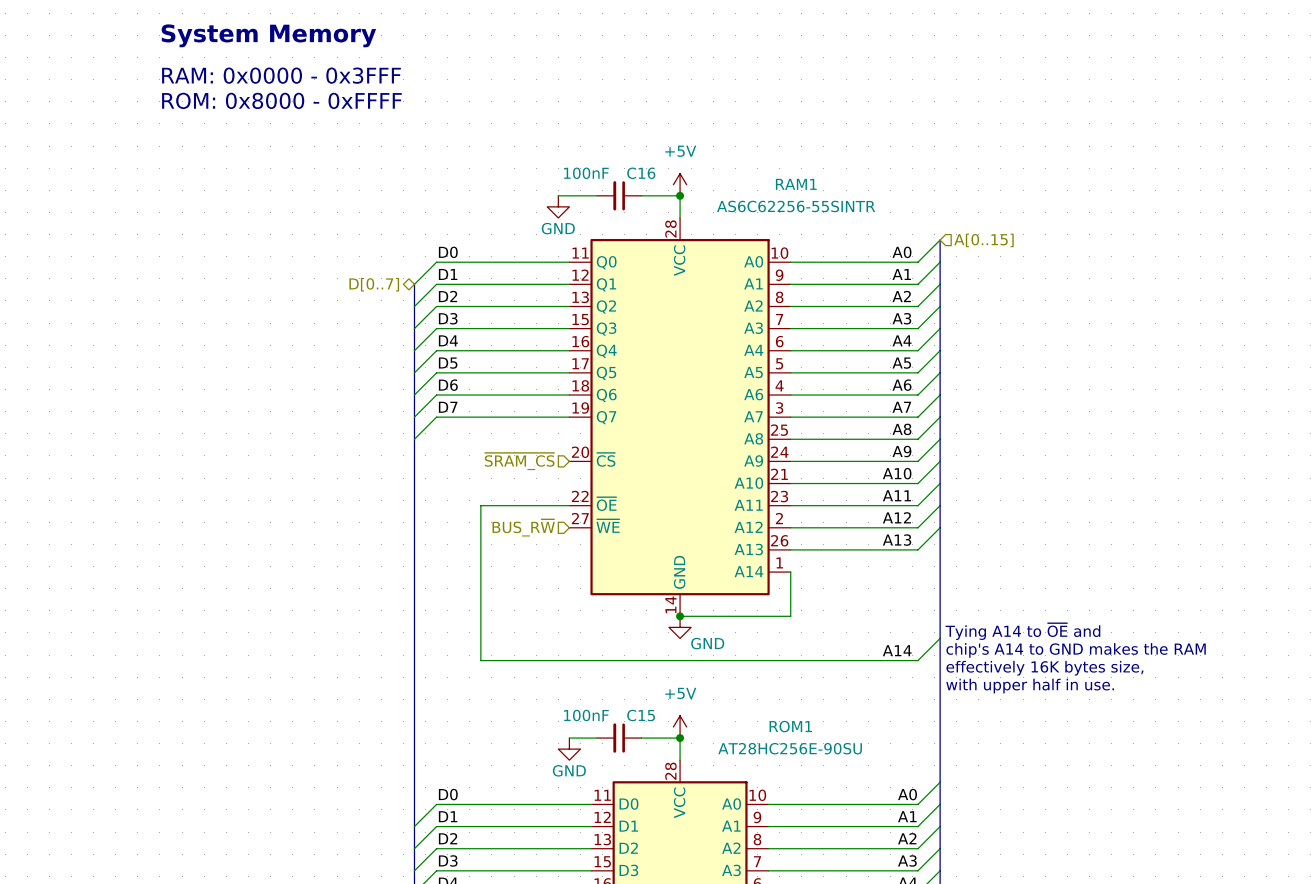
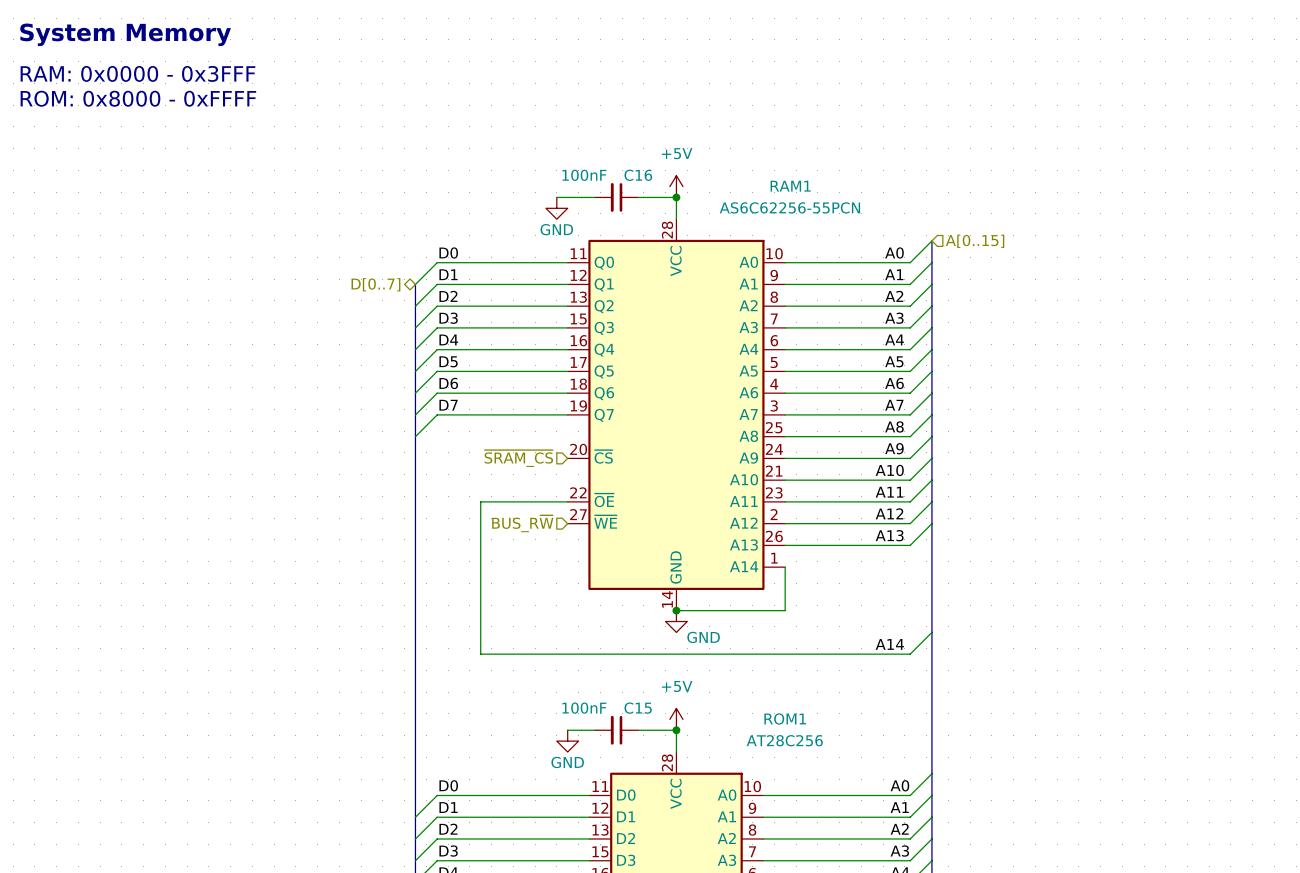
text position: System Memory (268, 35) -> System Memory (125, 34)
text position: RAM: 0x0000 - 0x3FFF (281, 75) -> RAM: 0x0000 - 0x3FFF (137, 73)
text position: ROM: 0x8000 - 0xFFFF (281, 100) -> ROM: 0x8000 - 0xFFFF (138, 98)
RAM1 value: AS6C62256-55SINTR (796, 206) -> AS6C62256-55PCN (789, 207)
text: Tying A14 to ~{OE} and (1022, 631) -> none
text: chip's A14 to GND makes the RAM (1076, 650) -> none
text: effectively 16K bytes size, (1044, 668) -> none
text: with upper half in use. (1030, 686) -> none
ROM1 value: AT28HC256E-90SU (790, 748) -> AT28C256 (784, 740)

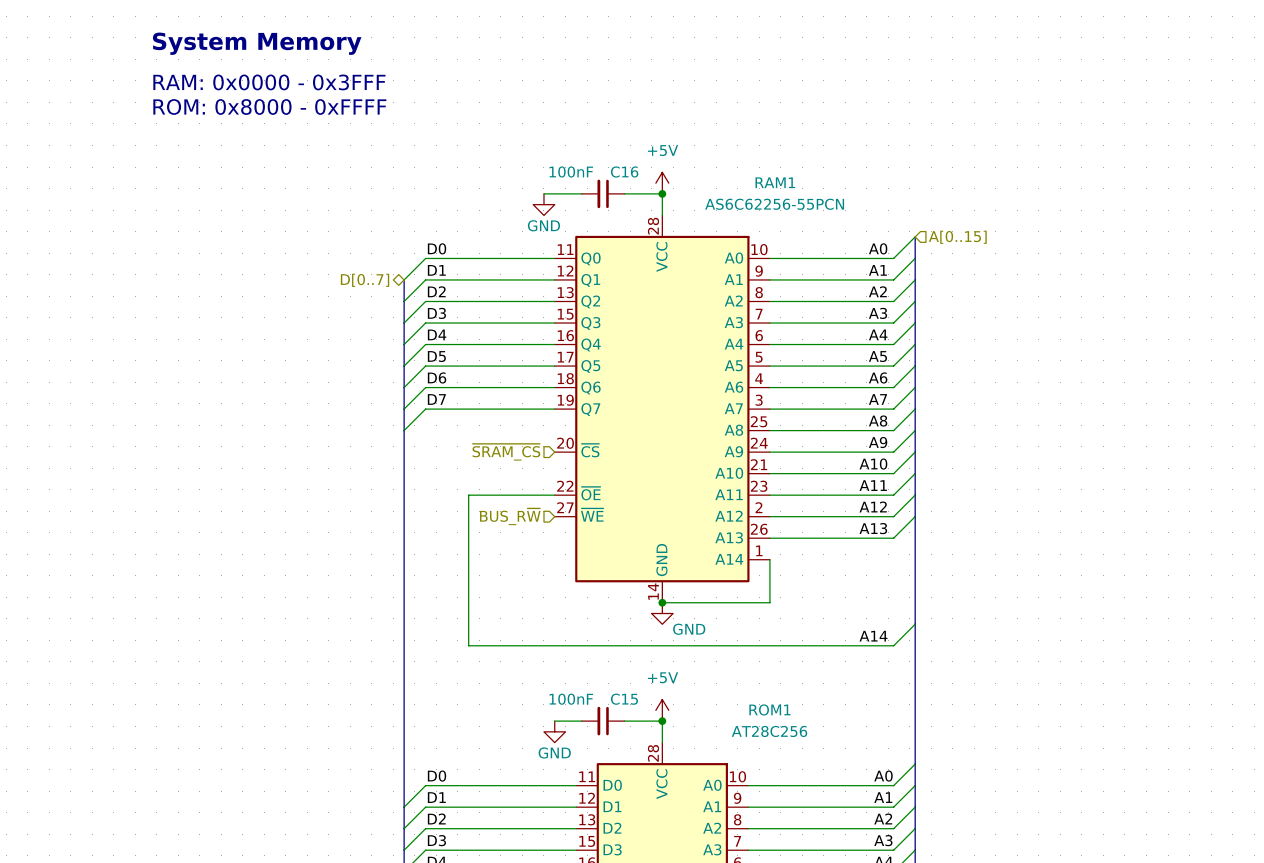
text position: System Memory (125, 34) -> System Memory (257, 43)
text position: RAM: 0x0000 - 0x3FFF (137, 73) -> RAM: 0x0000 - 0x3FFF (269, 82)
text position: ROM: 0x8000 - 0xFFFF (138, 98) -> ROM: 0x8000 - 0xFFFF (269, 106)

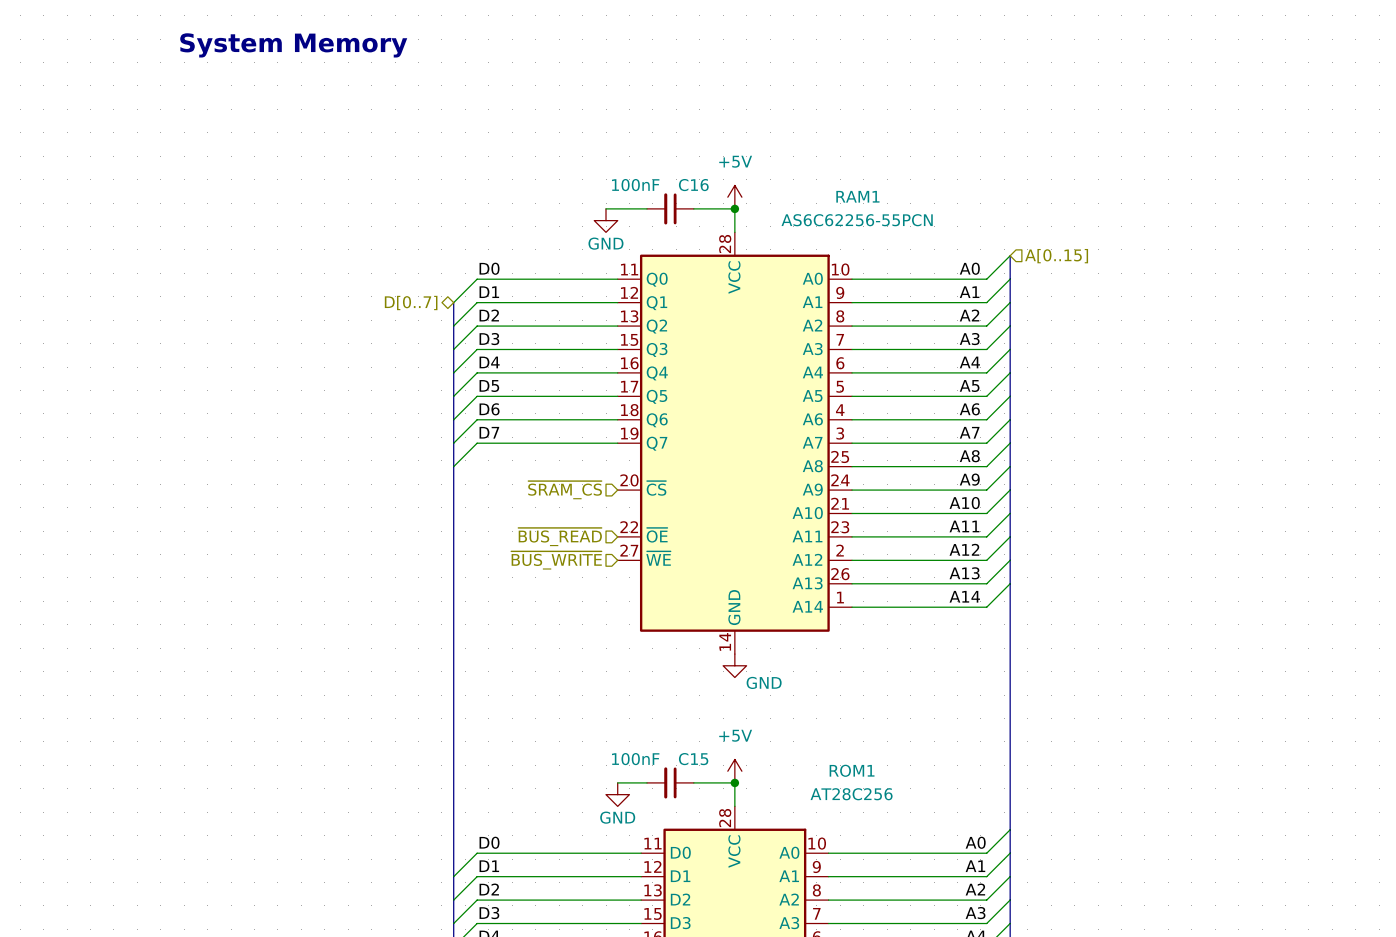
text: RAM: 0x0000 - 0x3FFF (269, 82) -> none
text: ROM: 0x8000 - 0xFFFF (269, 106) -> none
hierarchical label: none -> ~{BUS_READ} (560, 537)
wire: (554, 495) (468, 495) (468, 645) (893, 645) (915, 624) -> none
hierarchical label: BUS_R~{W} (510, 516) -> ~{BUS_WRITE} (556, 560)
wire: (769, 559) (769, 602) (662, 602) -> (852, 607) (986, 607) (1010, 583)
junction: (662, 602) -> none
label position: A14 (873, 636) -> A14 (964, 596)

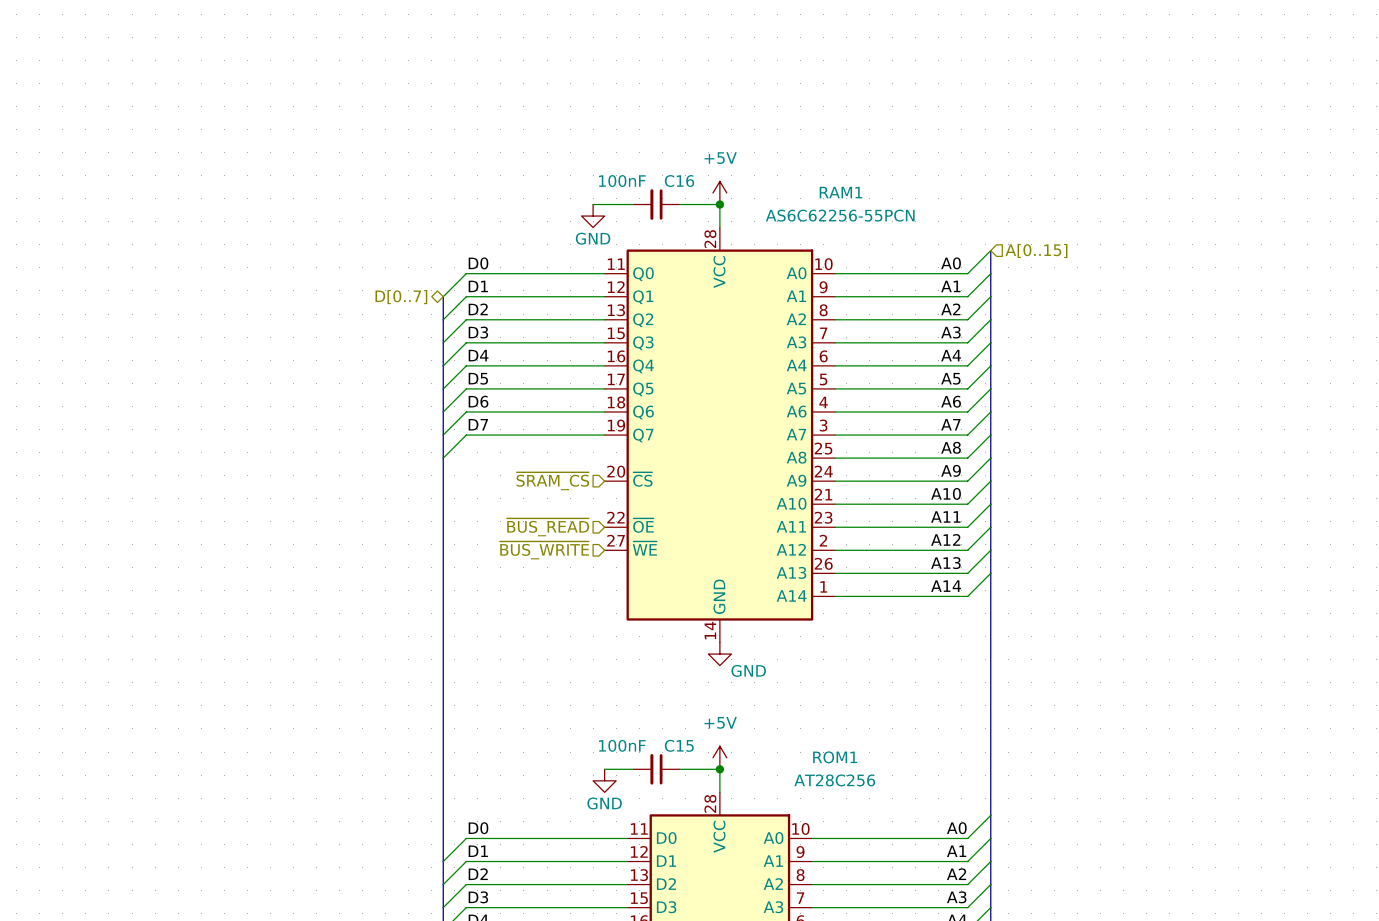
text: System Memory (293, 45) -> none

